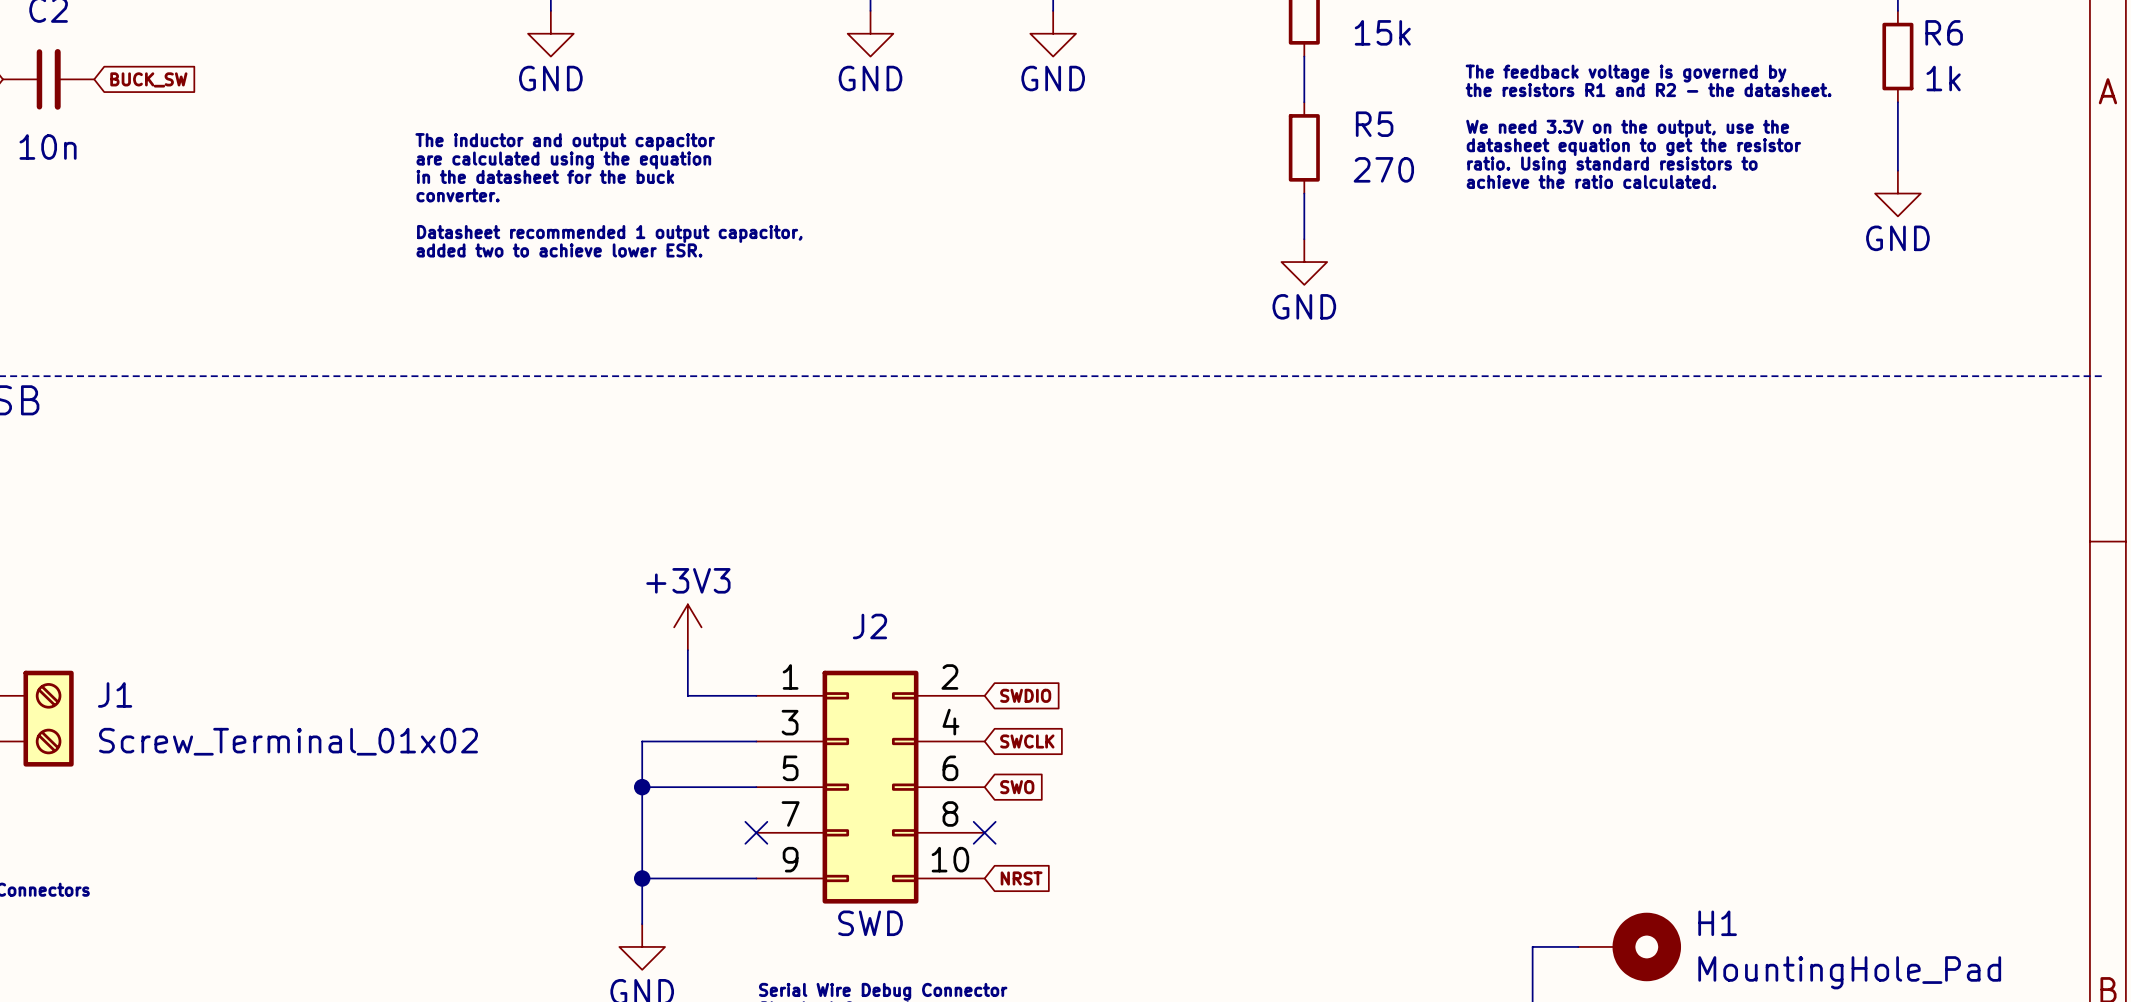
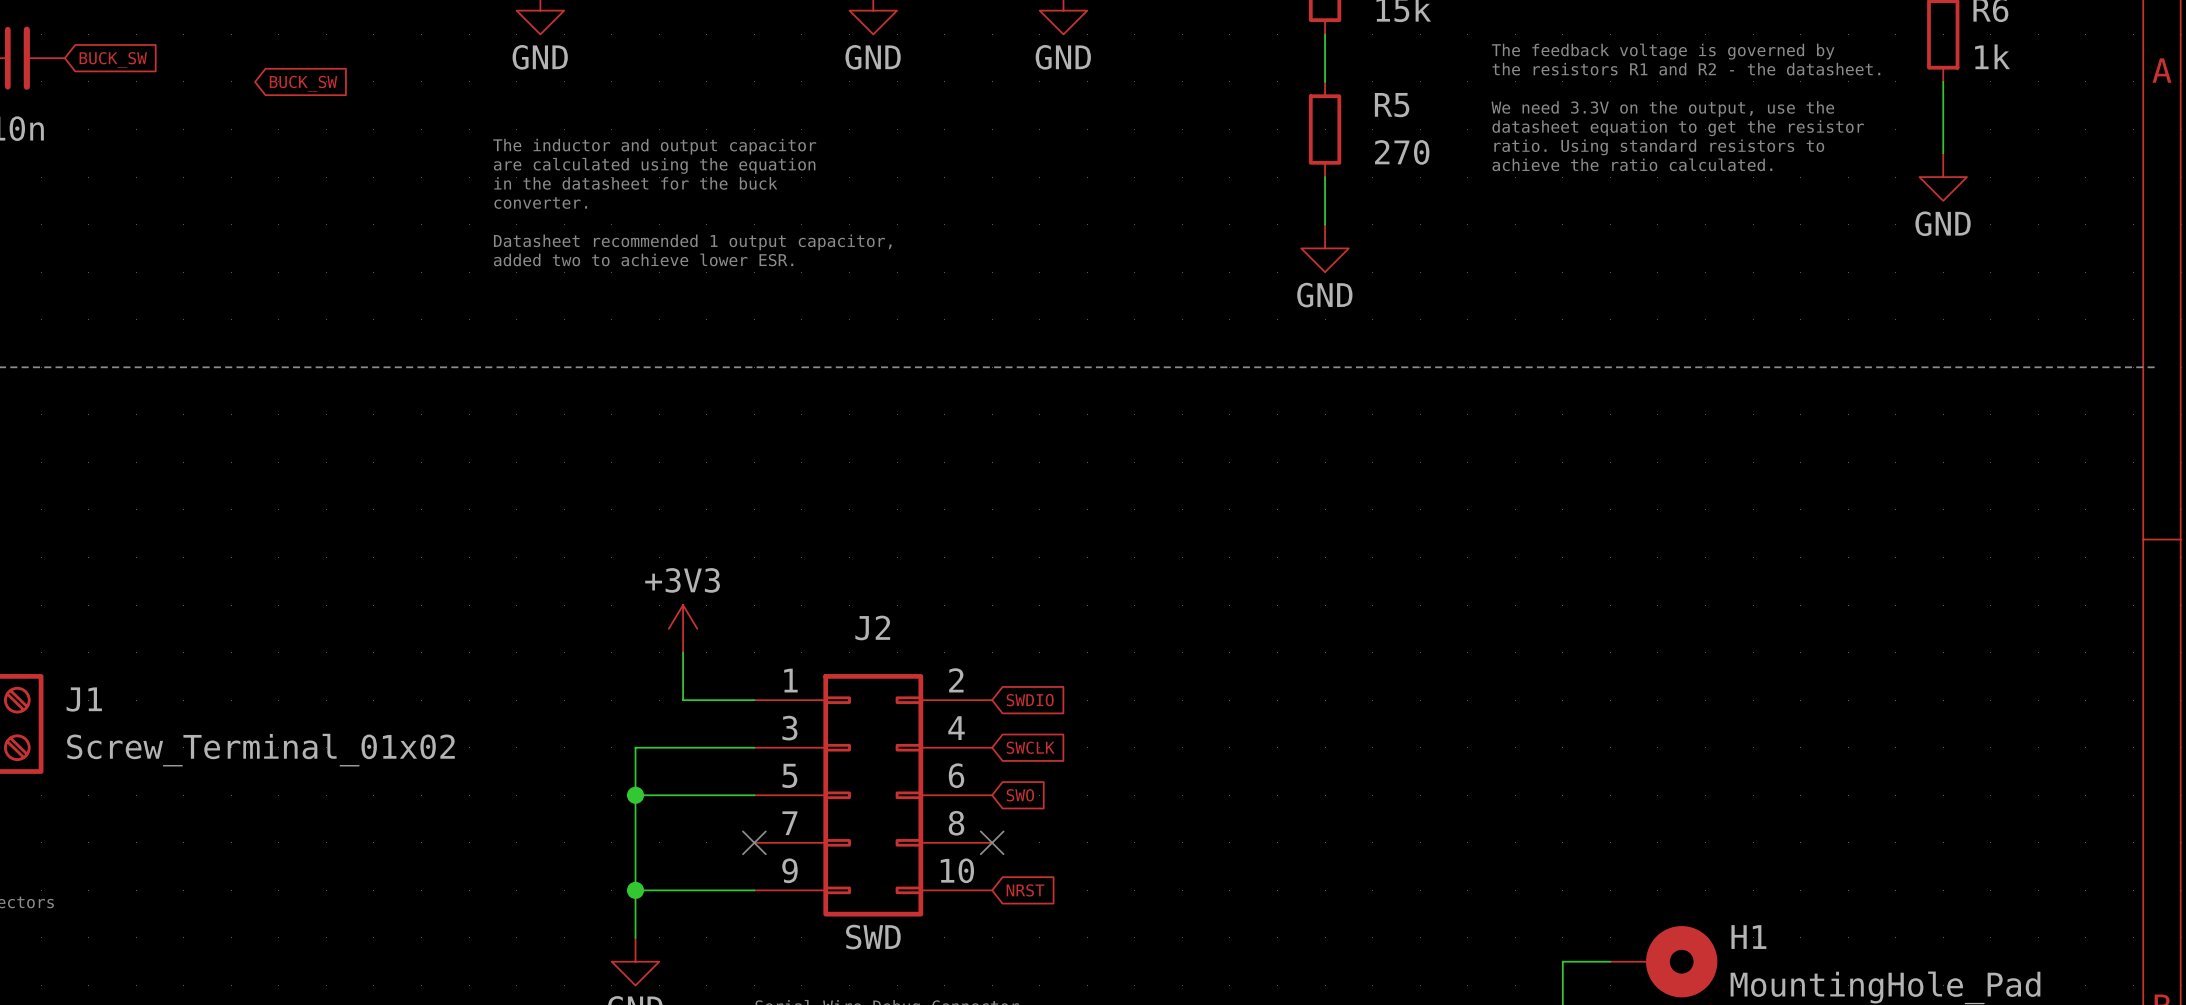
global label: none -> BUCK_SW (303, 83)
text position: The inductor and output capacitor (565, 142) -> The inductor and output capacitor (654, 146)
text position: are calculated using the equation (563, 160) -> are calculated using the equation (654, 165)
text position: in the datasheet for the buck (545, 176) -> in the datasheet for the buck (635, 183)
text position: converter. (458, 195) -> converter. (540, 203)
text position: Datasheet recommended 1 output capacitor, (609, 233) -> Datasheet recommended 1 output capacitor, (692, 242)
text position: added two to achieve lower ESR. (559, 250) -> added two to achieve lower ESR. (643, 259)

